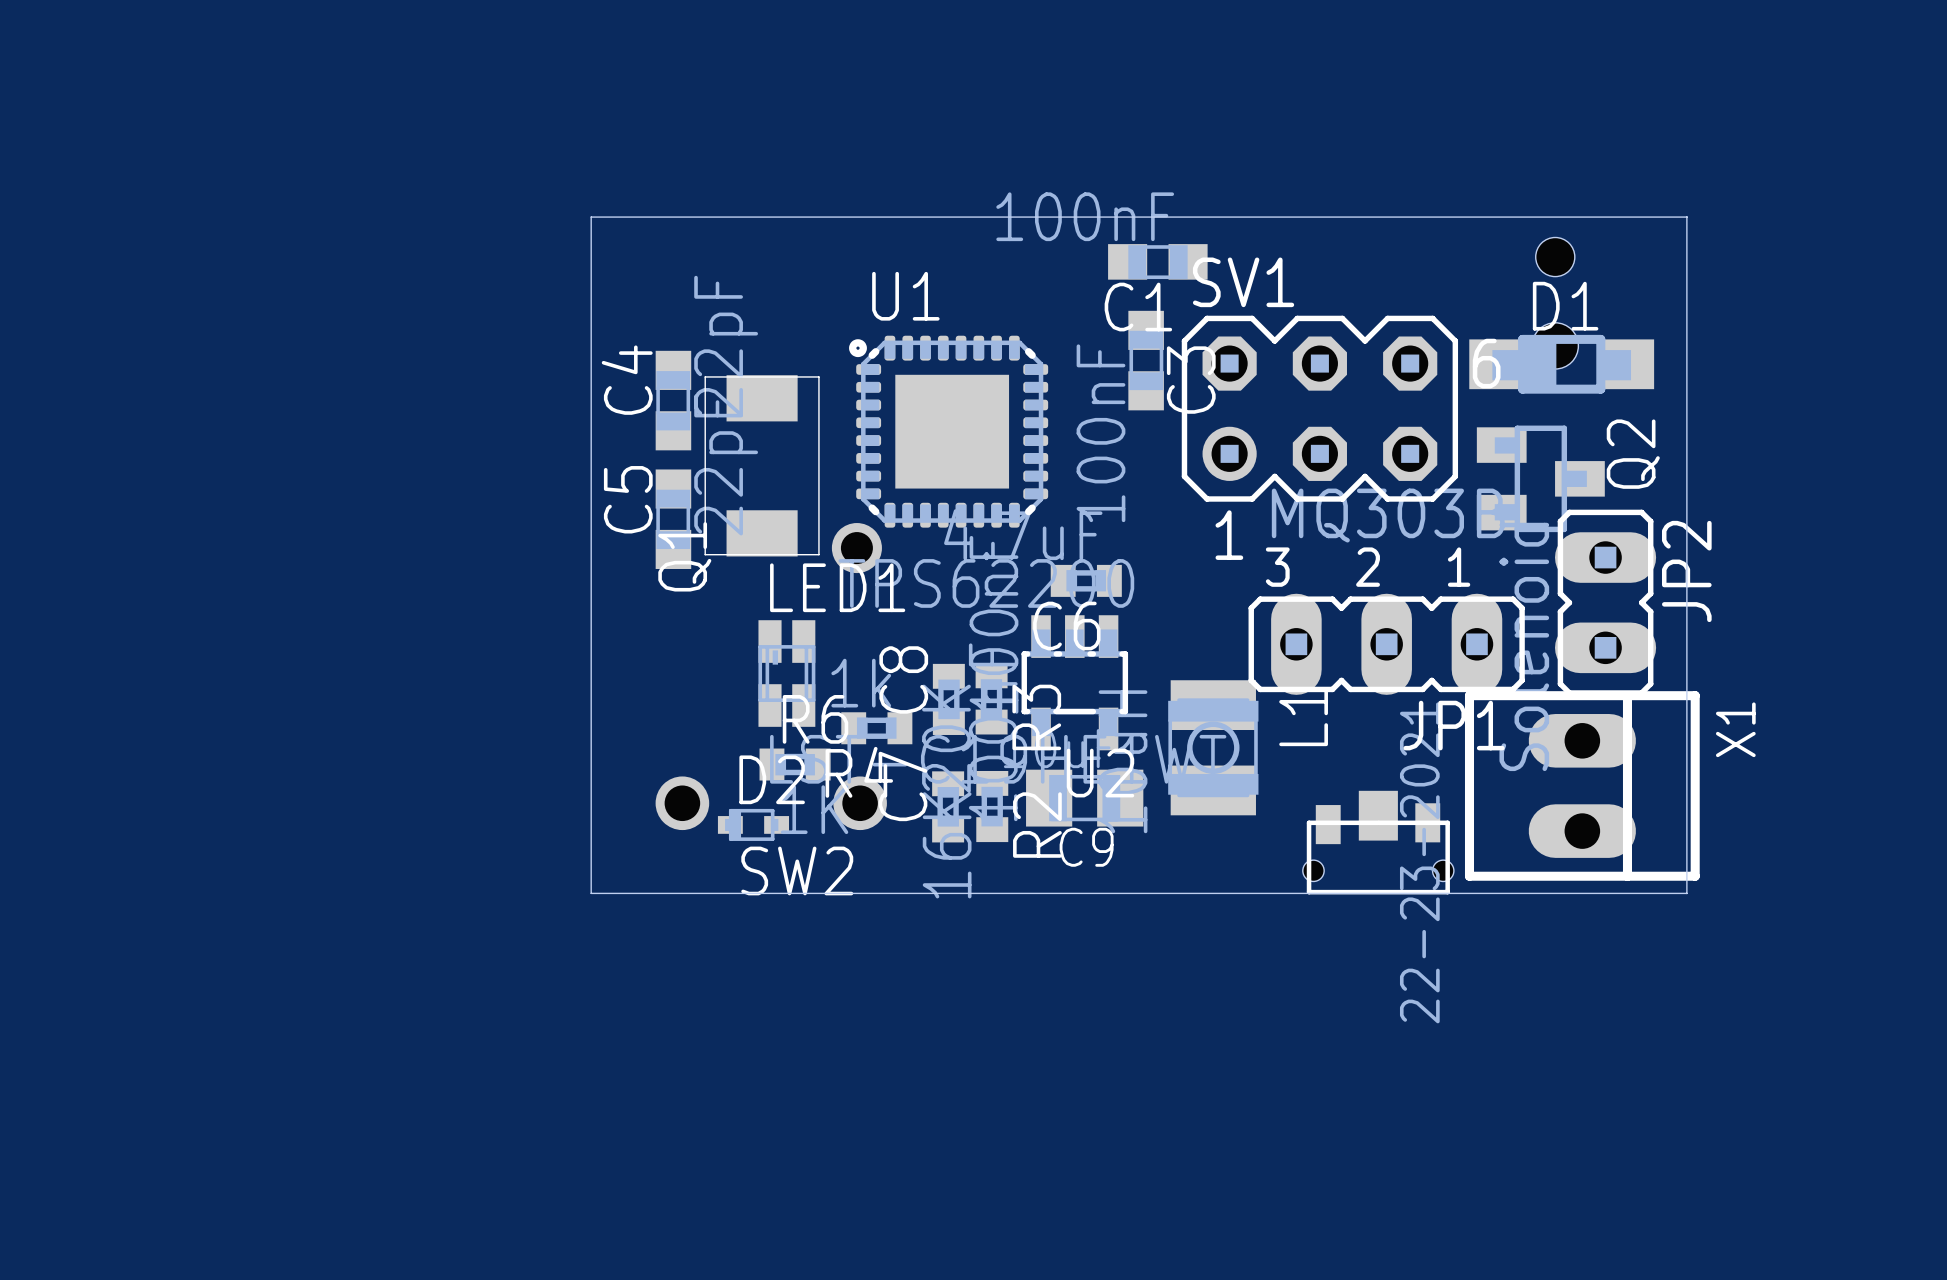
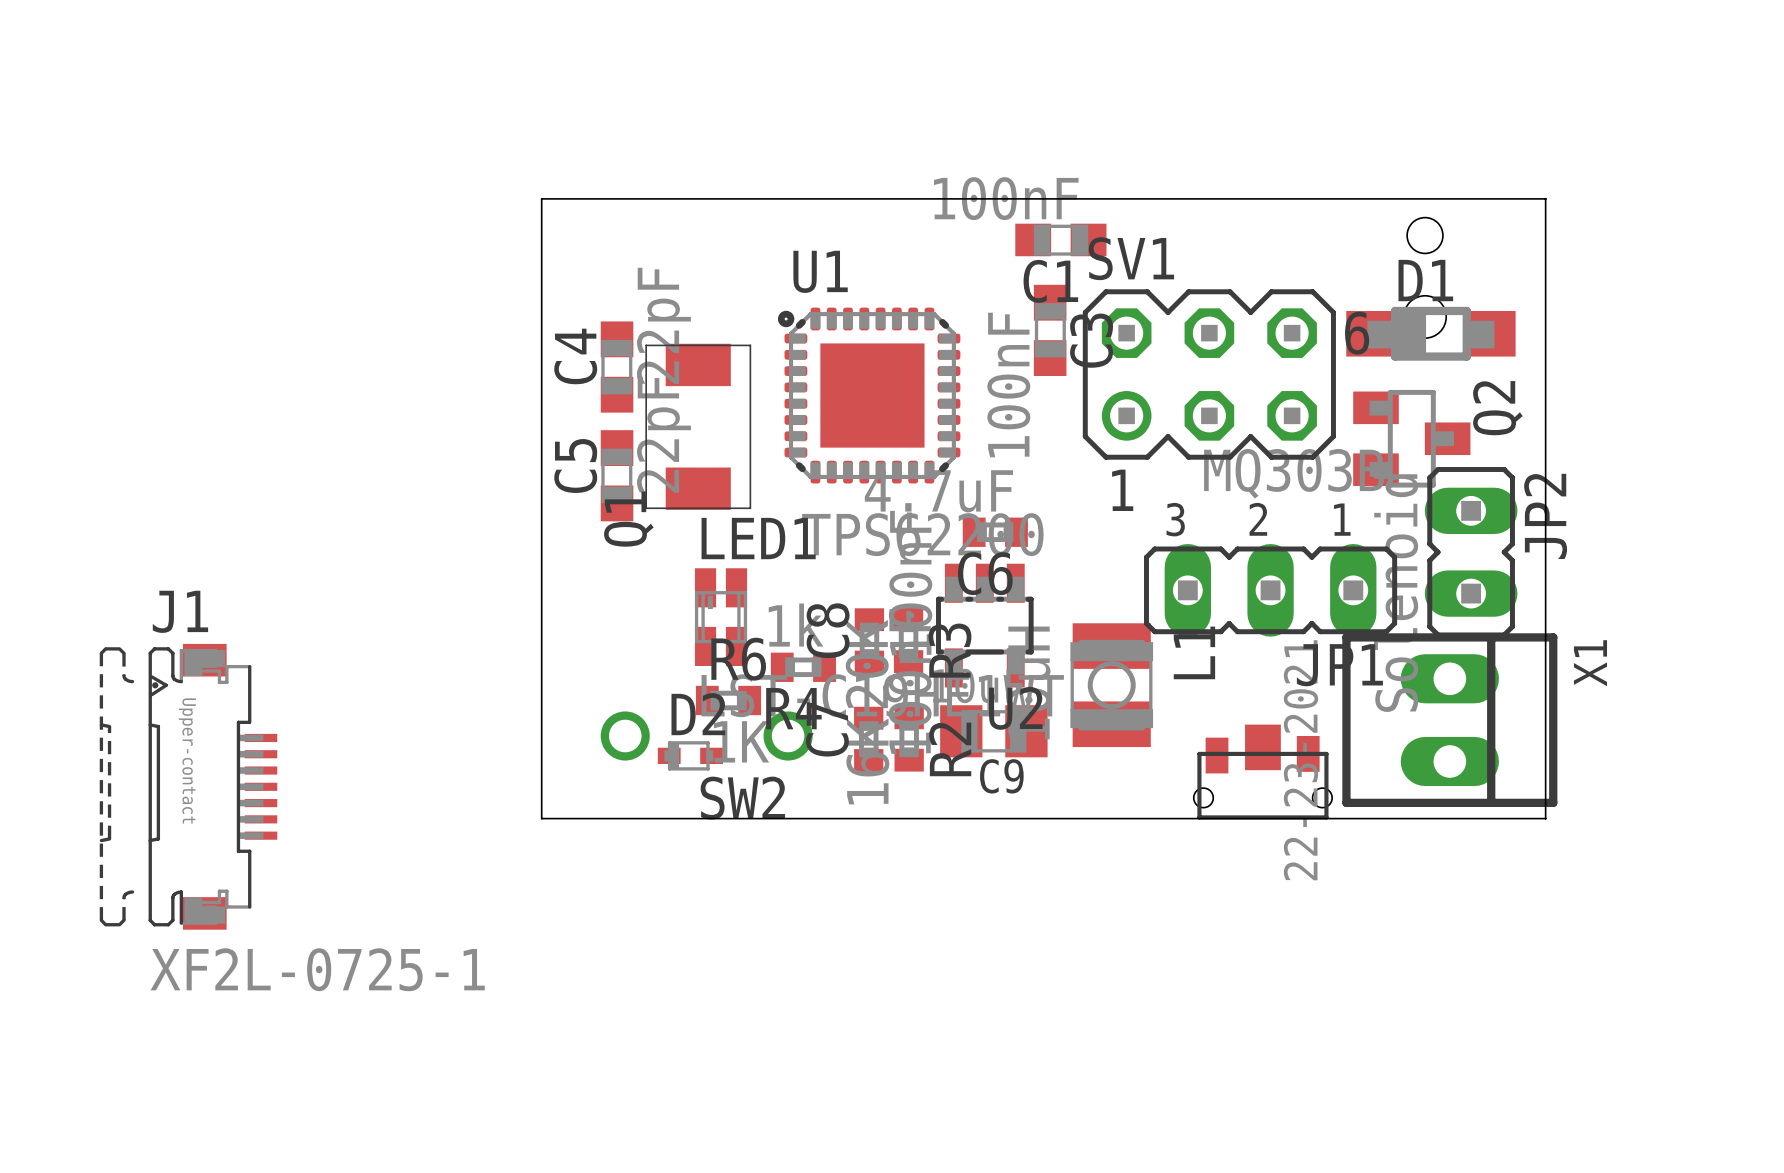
part: (856, 548) -> none
J1: none -> XF2L-0725-1 (188, 786)

